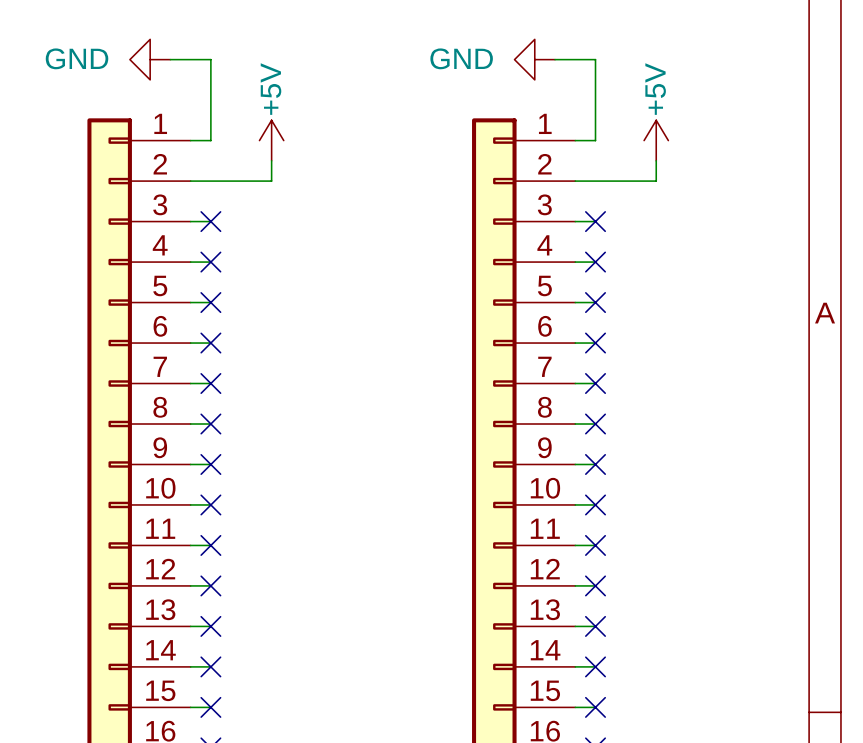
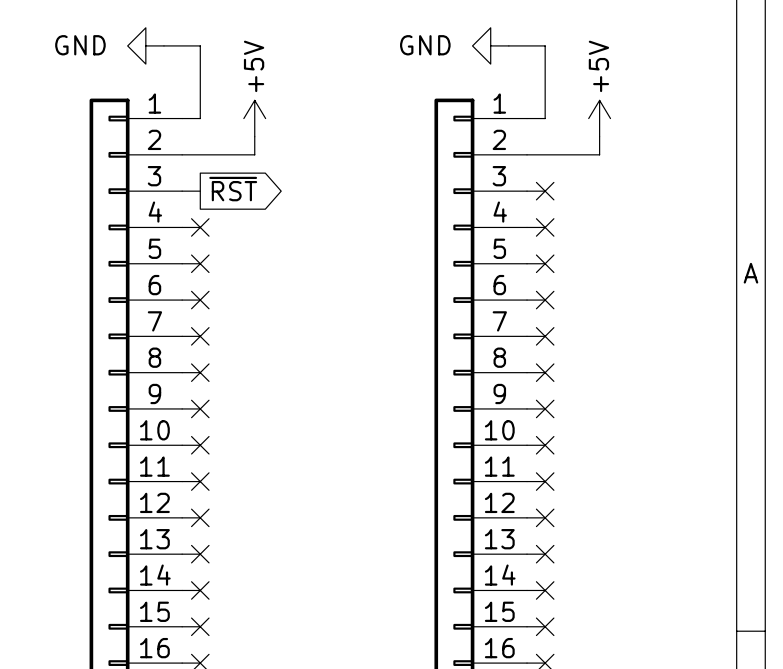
global label: none -> ~{RST} (233, 189)
no-connect mark: (210, 221) -> none

